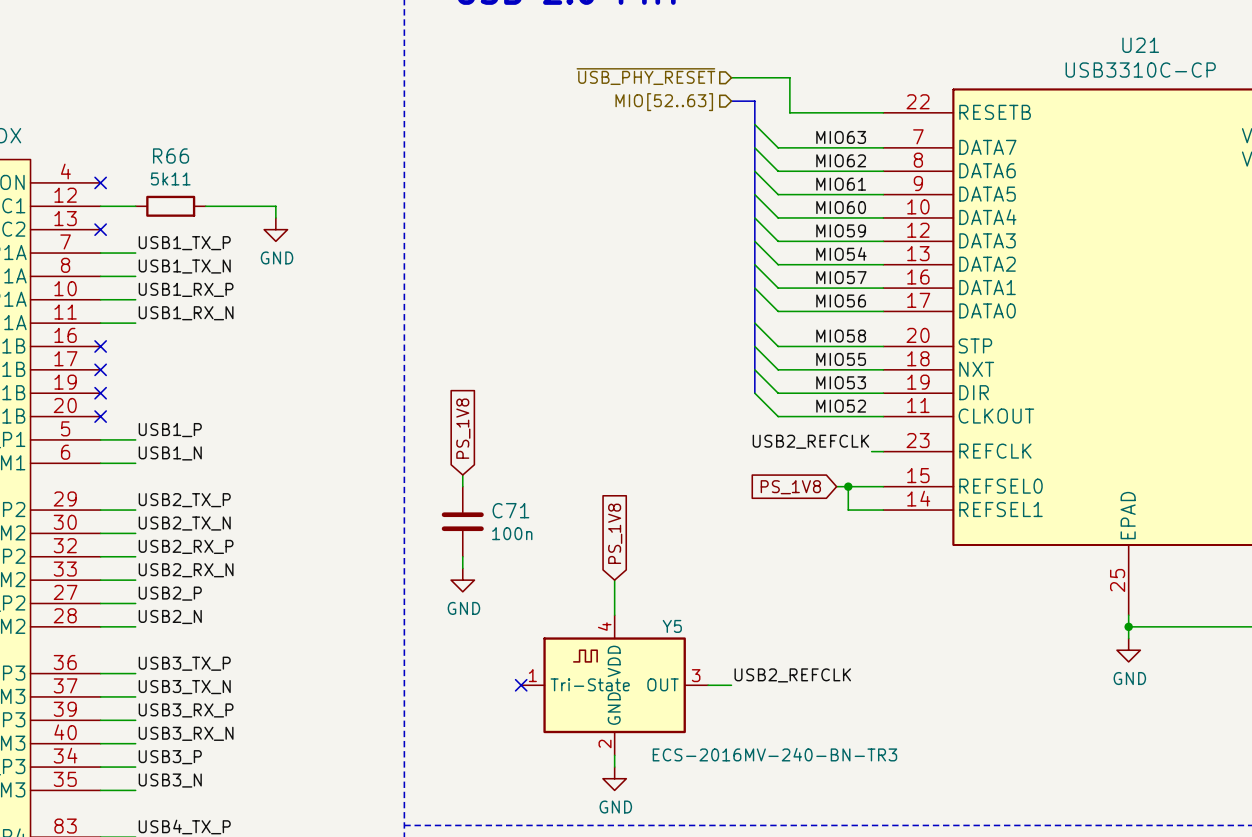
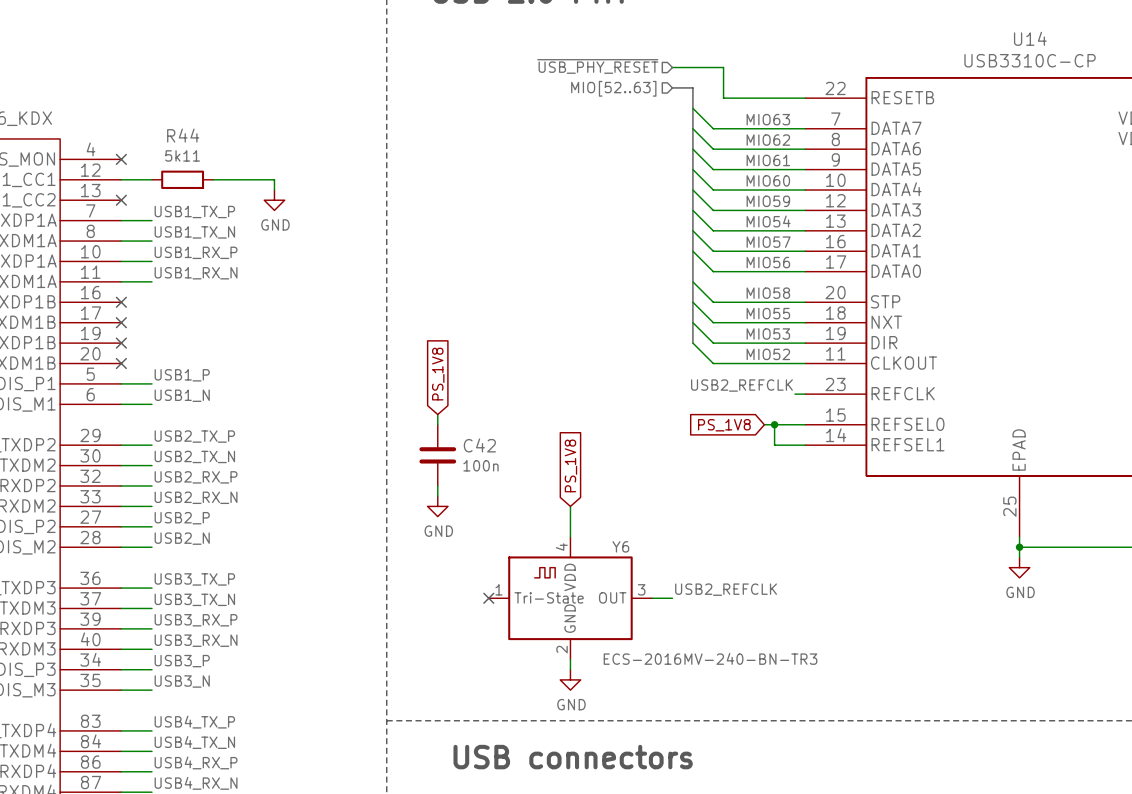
U21 name: U21 (1140, 45) -> U14 (1030, 38)
R66 name: R66 (171, 156) -> R44 (183, 135)
C71 name: C71 (510, 510) -> C42 (479, 445)
Y5 name: Y5 (672, 626) -> Y6 (620, 546)

